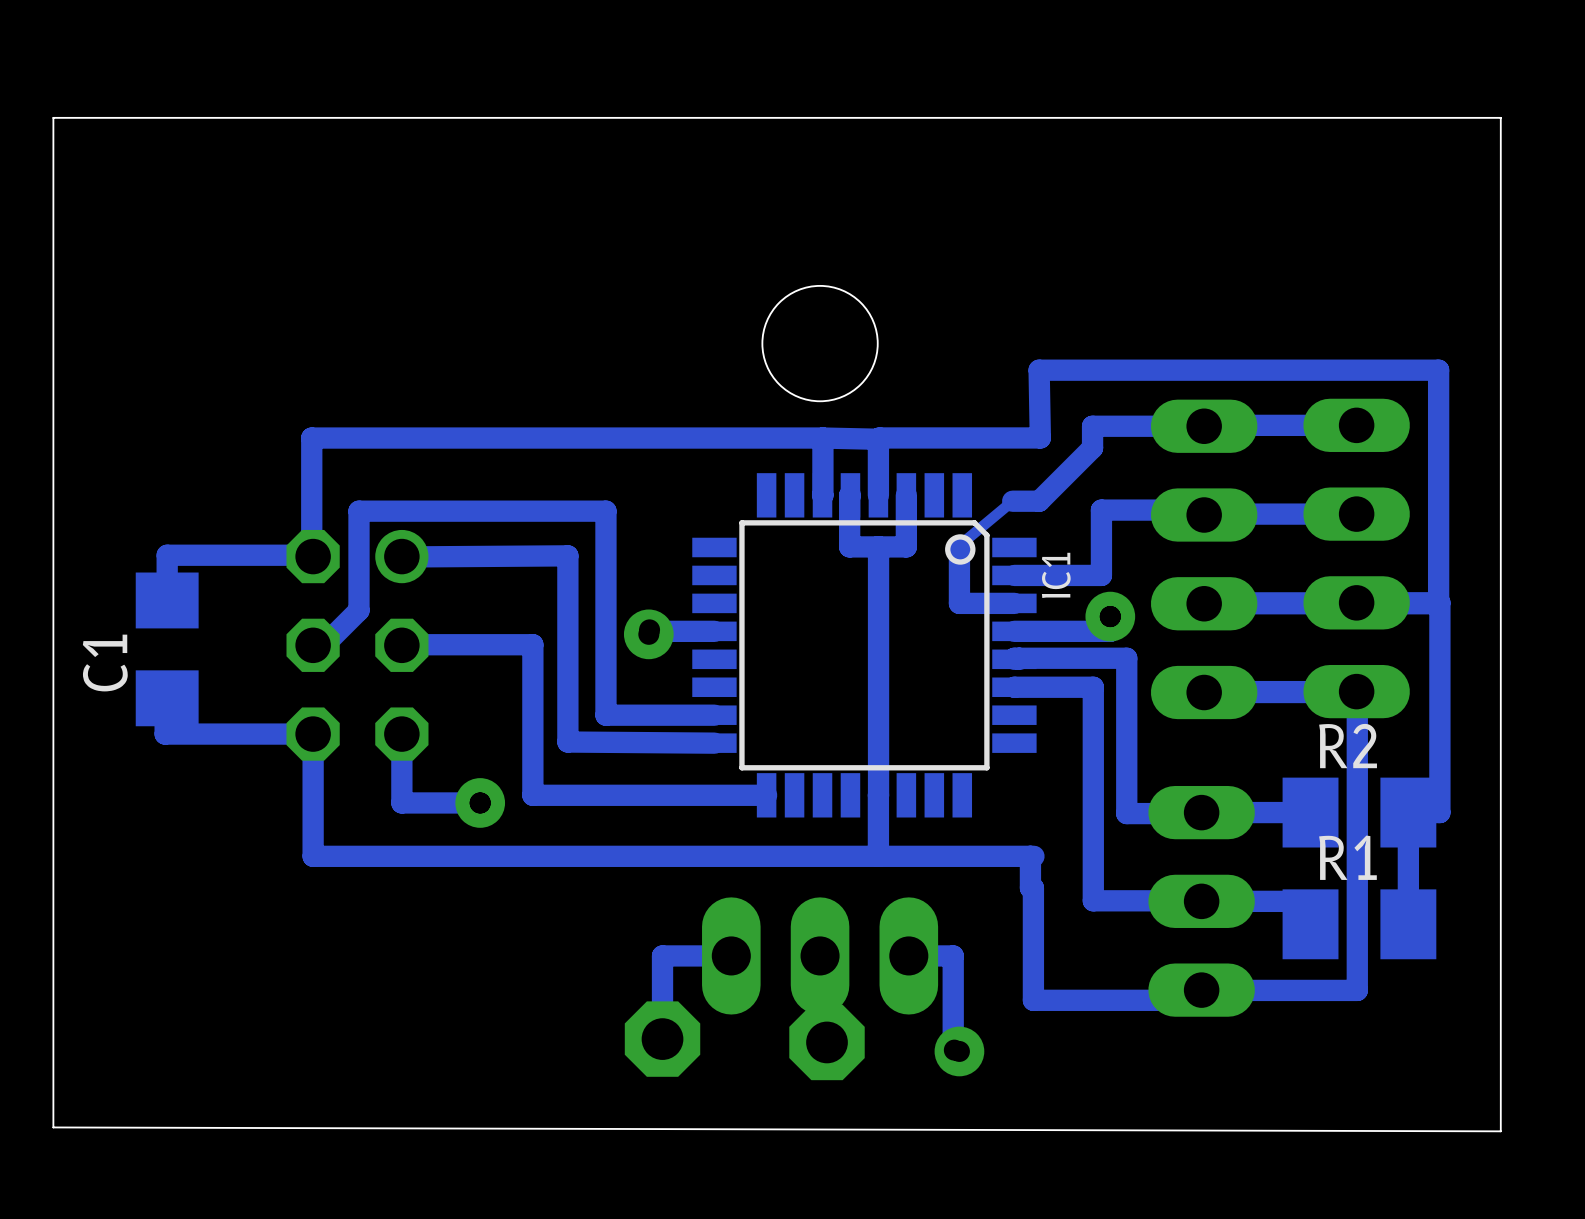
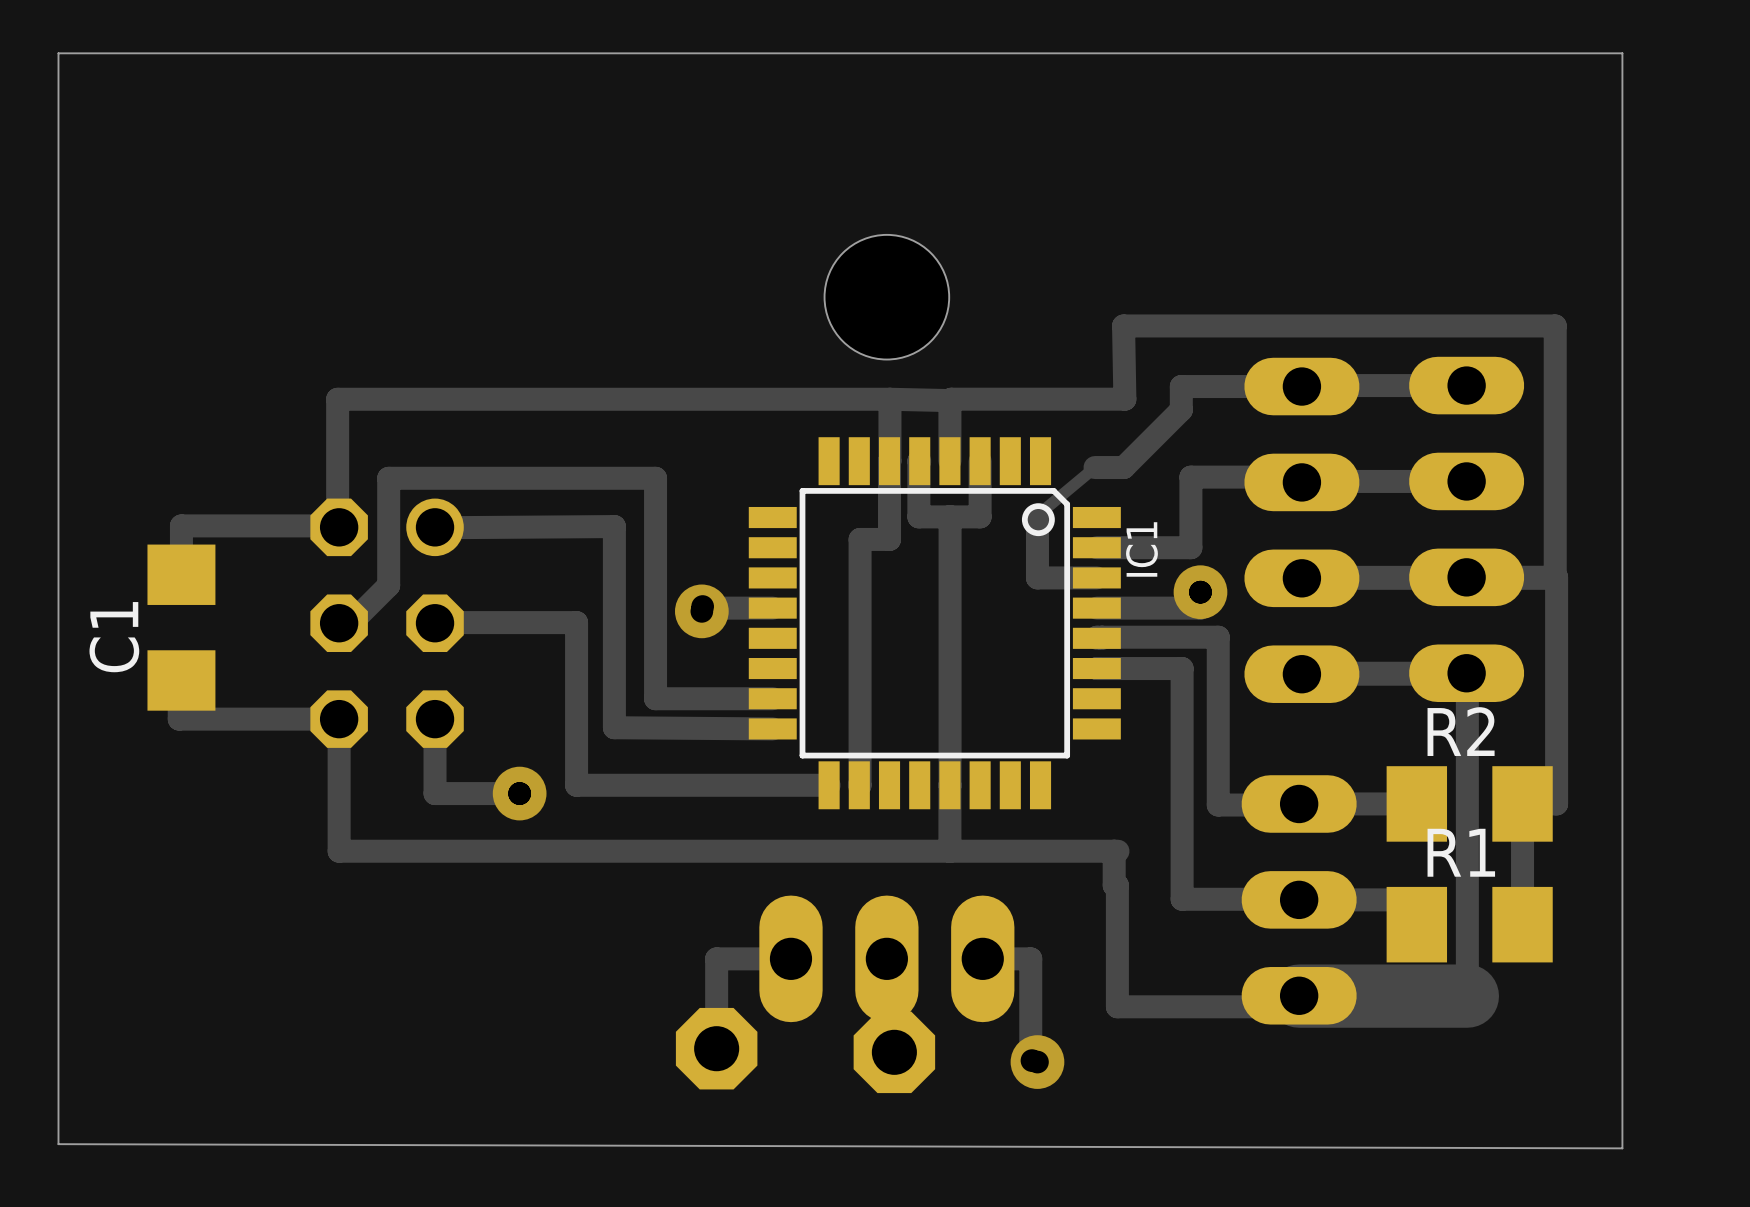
track: none -> (889, 461) (889, 539) (860, 539) (859, 785)
track width: thin (1357, 990) (1201, 990) -> thick (1467, 996) (1299, 996)

